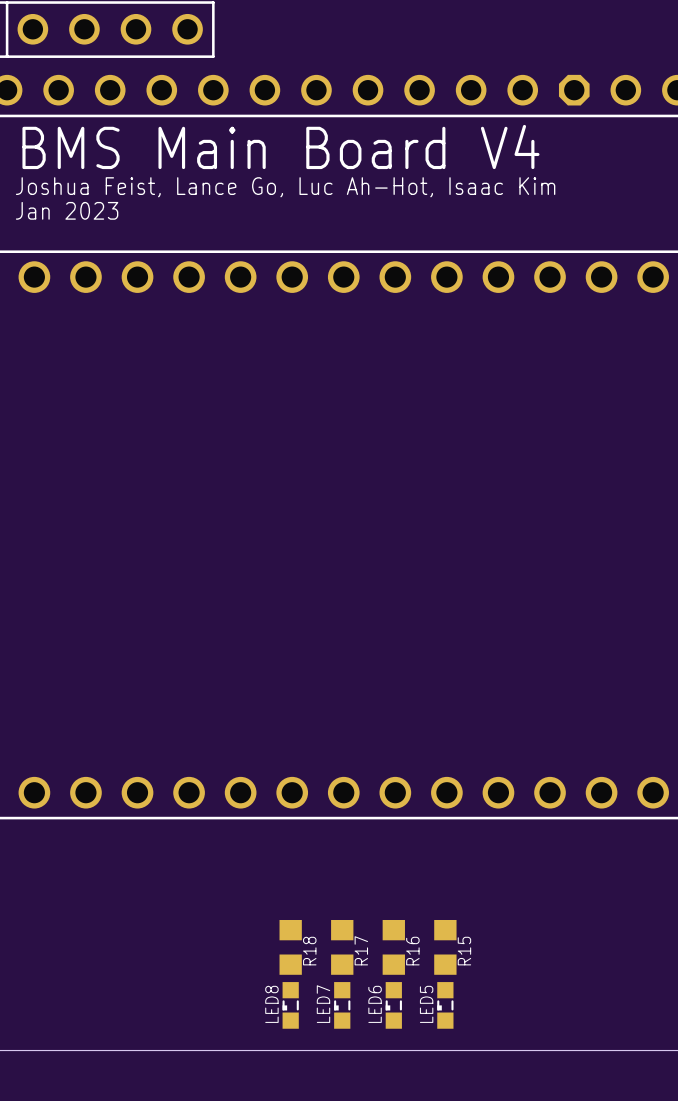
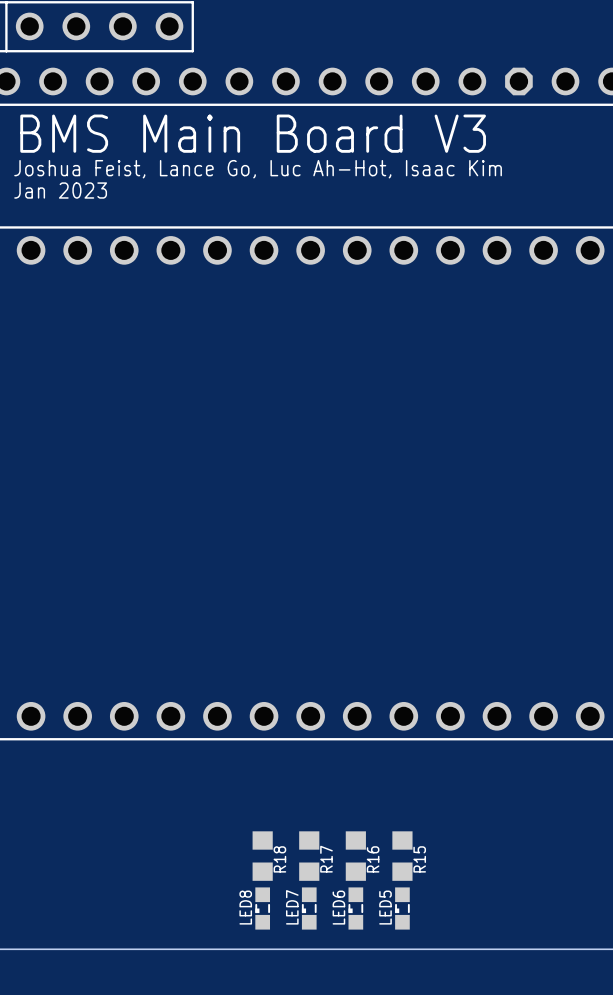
text: BMS Main Board V4 (280, 146) -> BMS Main Board V3 (253, 133)

